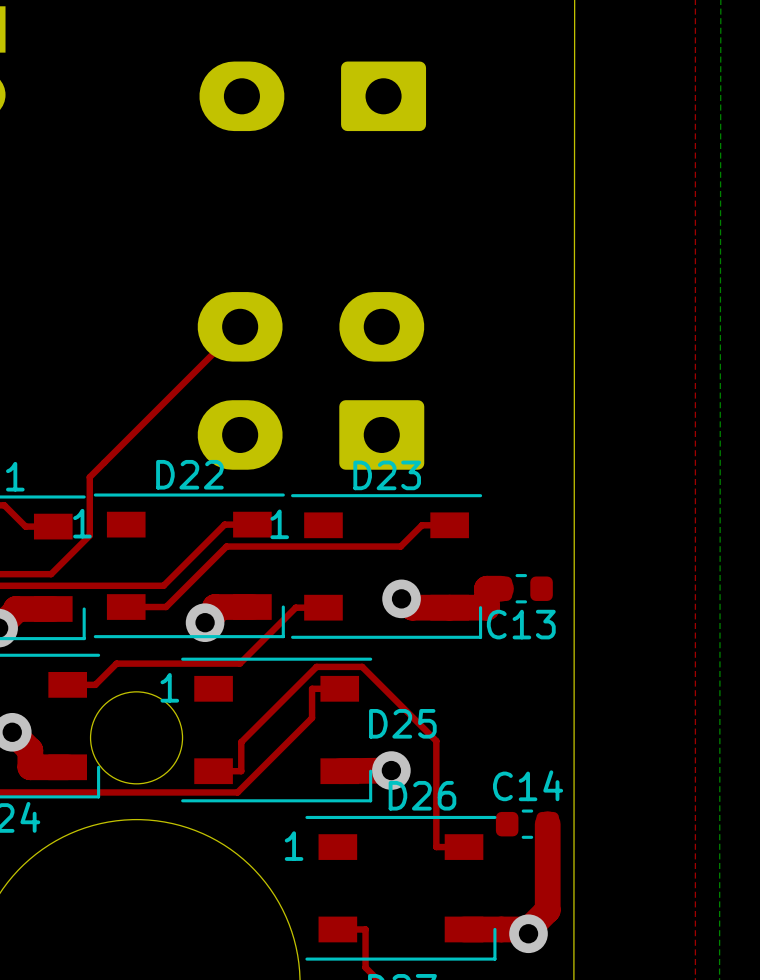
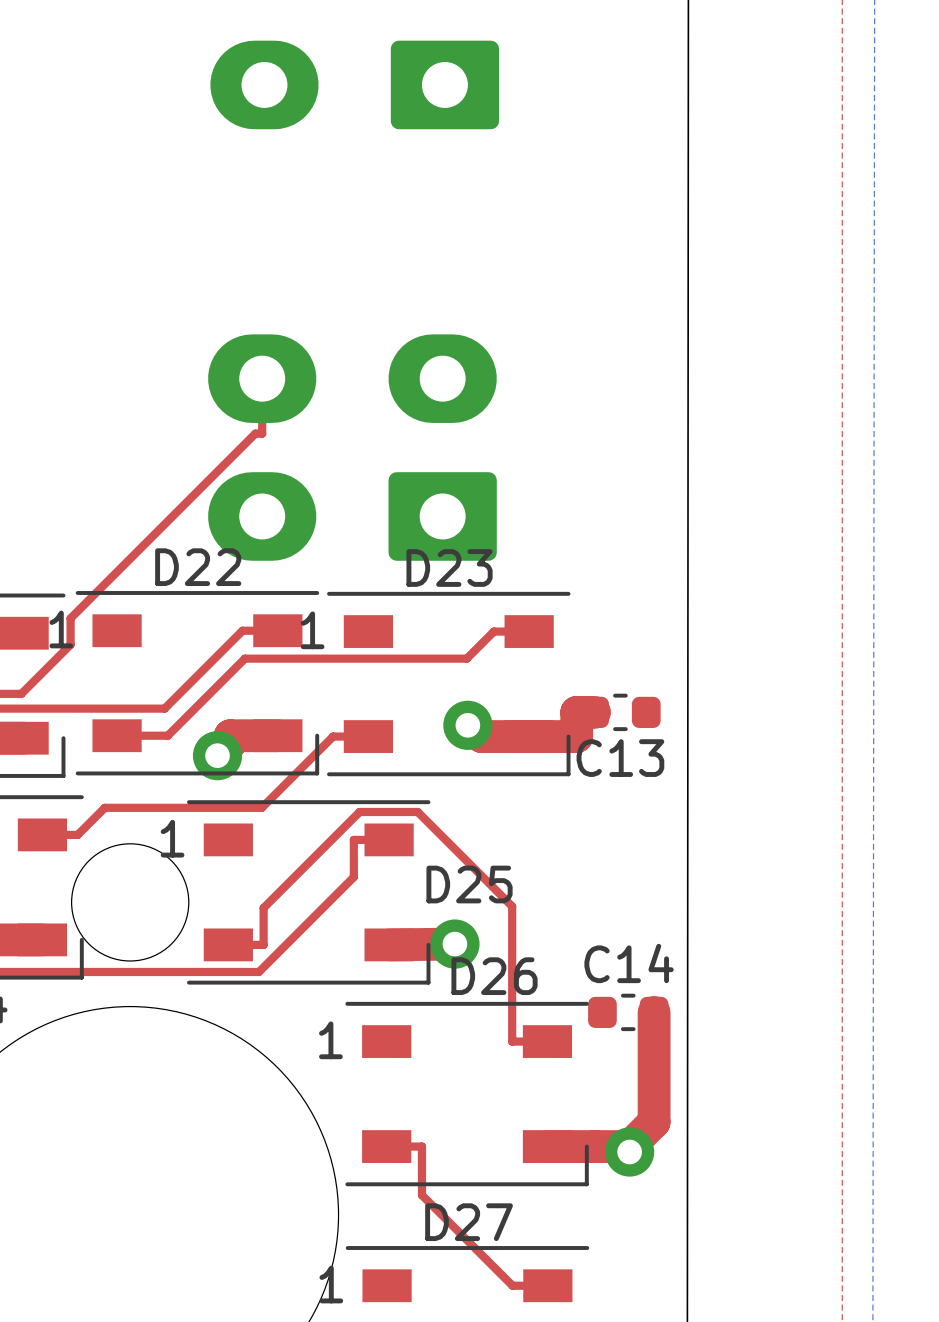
top track: (240, 326) (89, 477) (89, 514) -> (262, 378) (262, 433) (255, 433) (70, 618)

